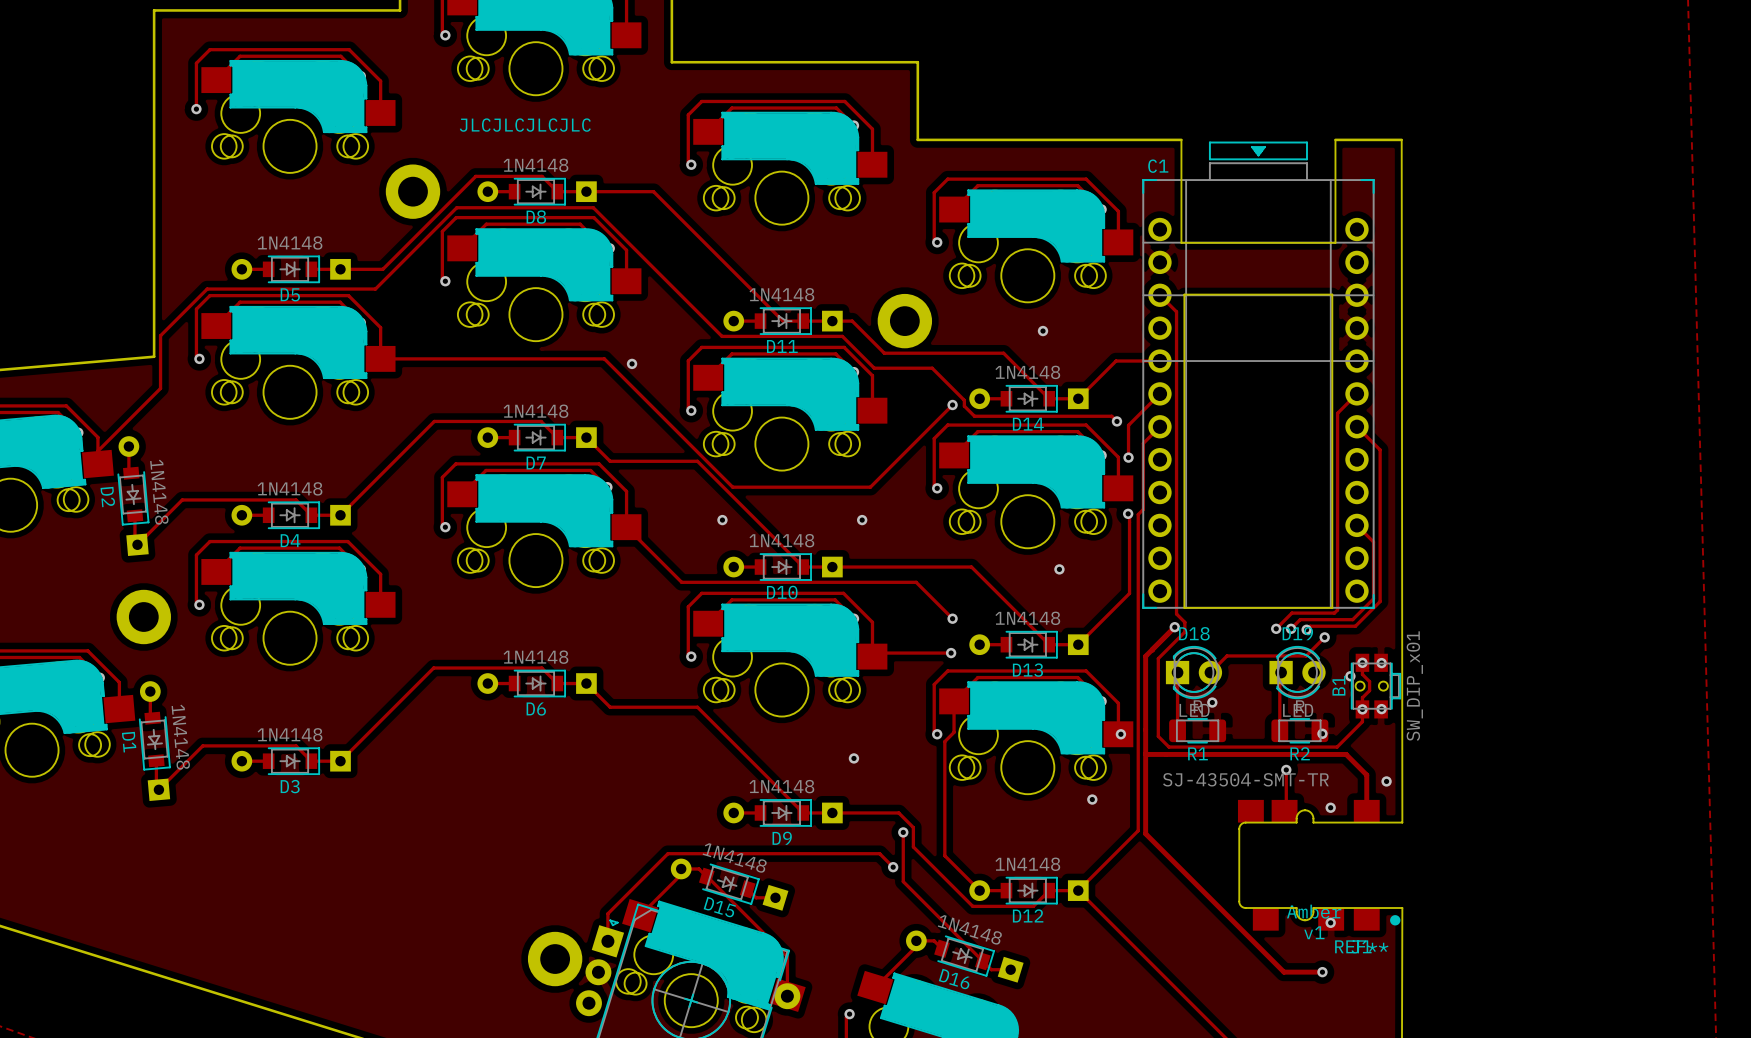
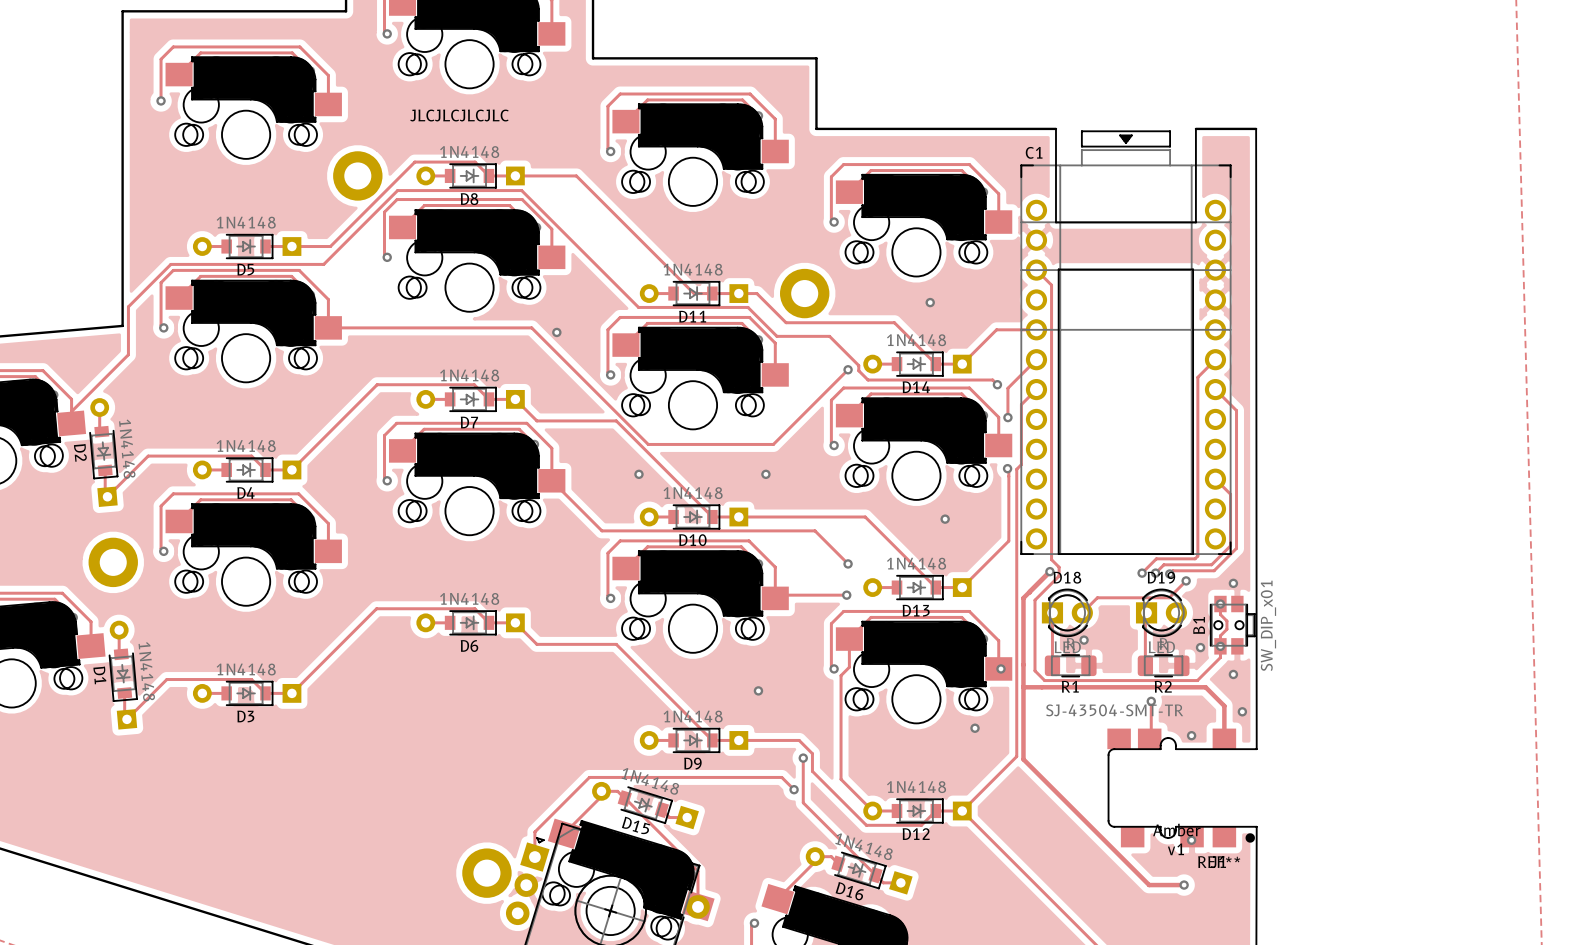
via: none -> (1233, 583)
via: (1381, 663) -> none
via: (1350, 676) -> none
via: (1381, 709) -> none
via: none -> (1200, 647)
via: (1322, 733) -> none
via: none -> (1233, 674)

